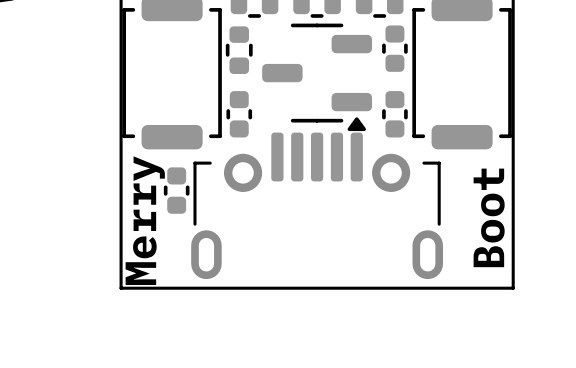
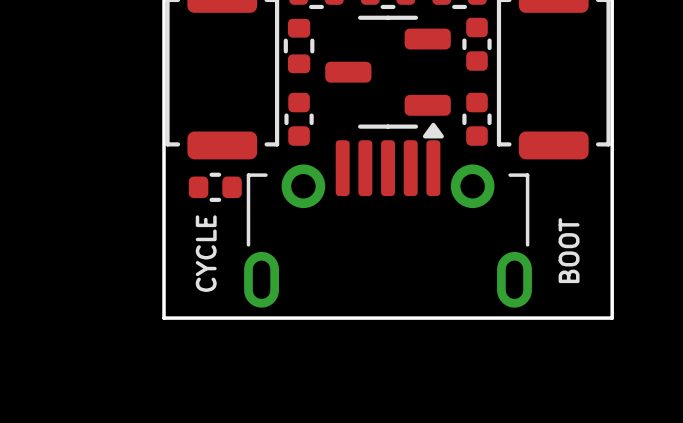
part rotation: 0° (176, 190) -> 90° clockwise (215, 187)
text: Boot (489, 217) -> BOOT (569, 250)
text: Merry (145, 220) -> CYCLE (206, 253)

